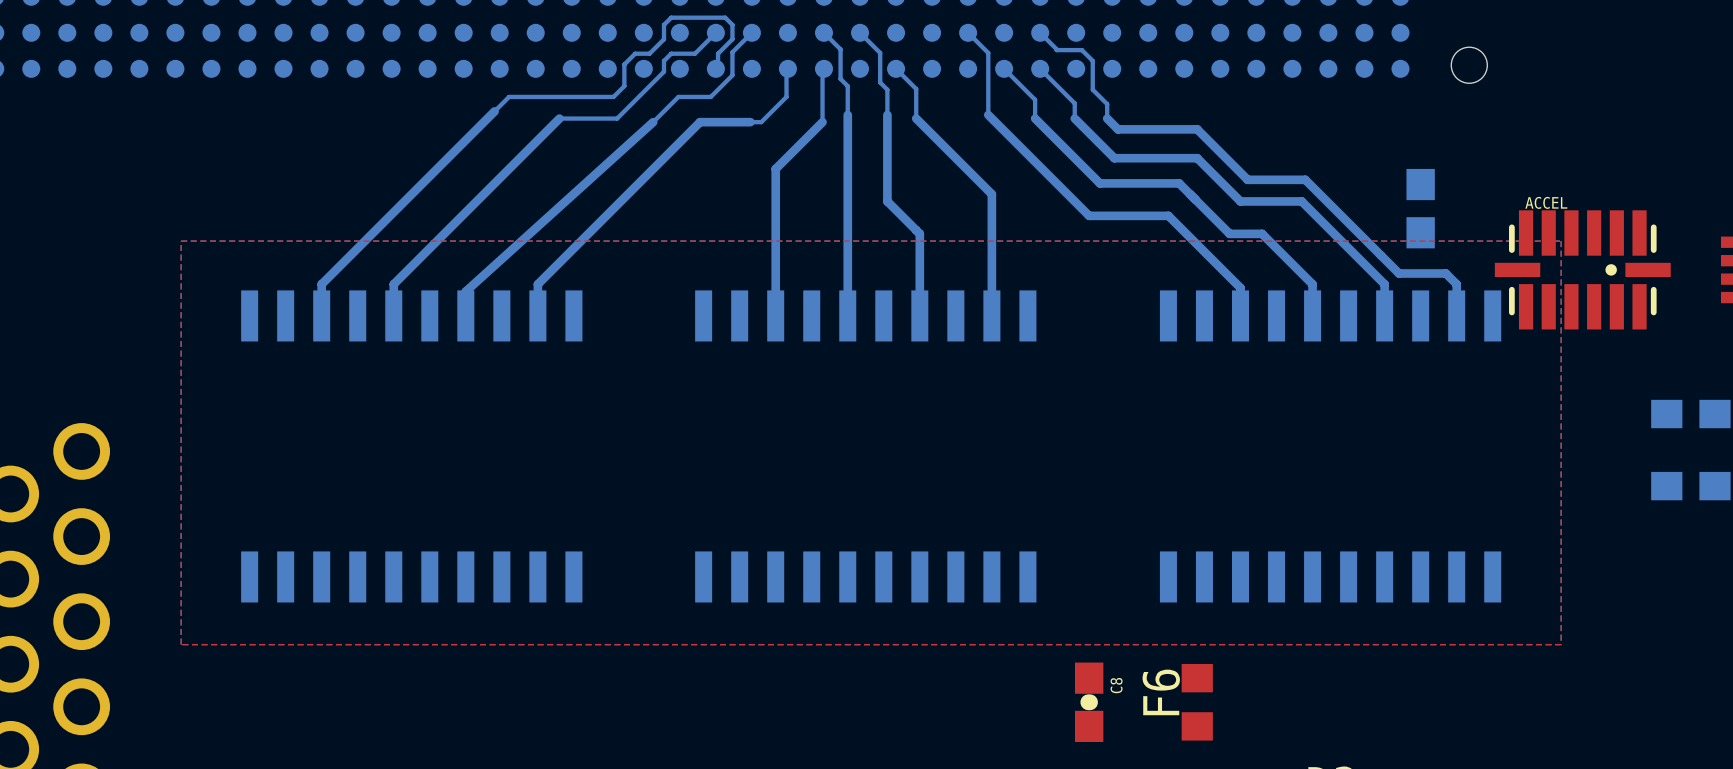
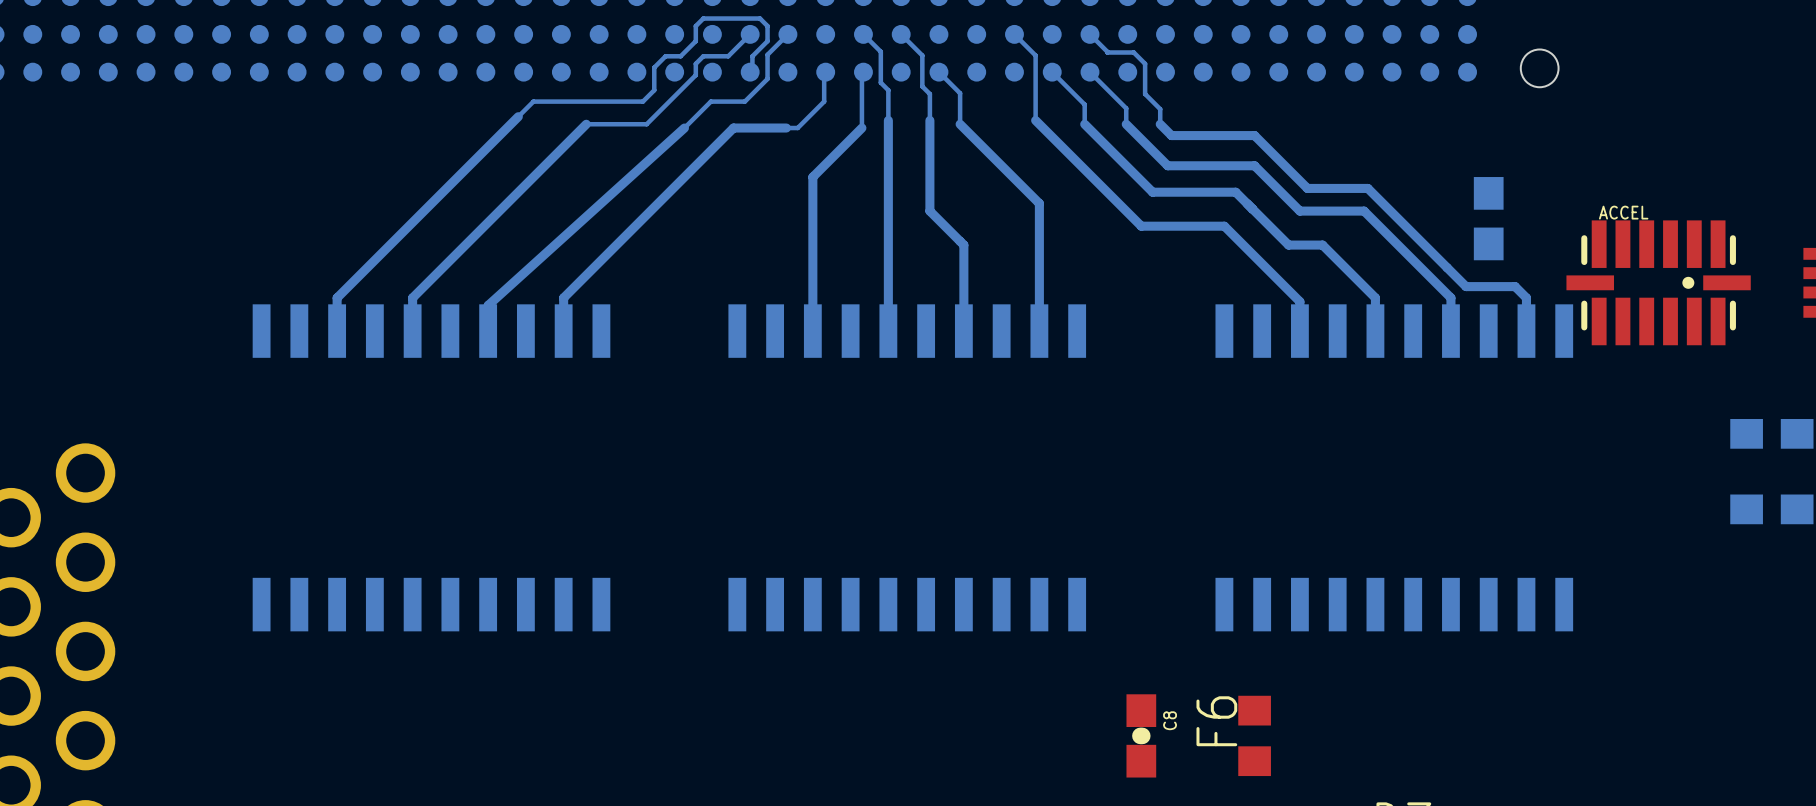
top zone outline: (181, 241) (1561, 241) (1561, 644) (181, 644) (181, 241) -> none

